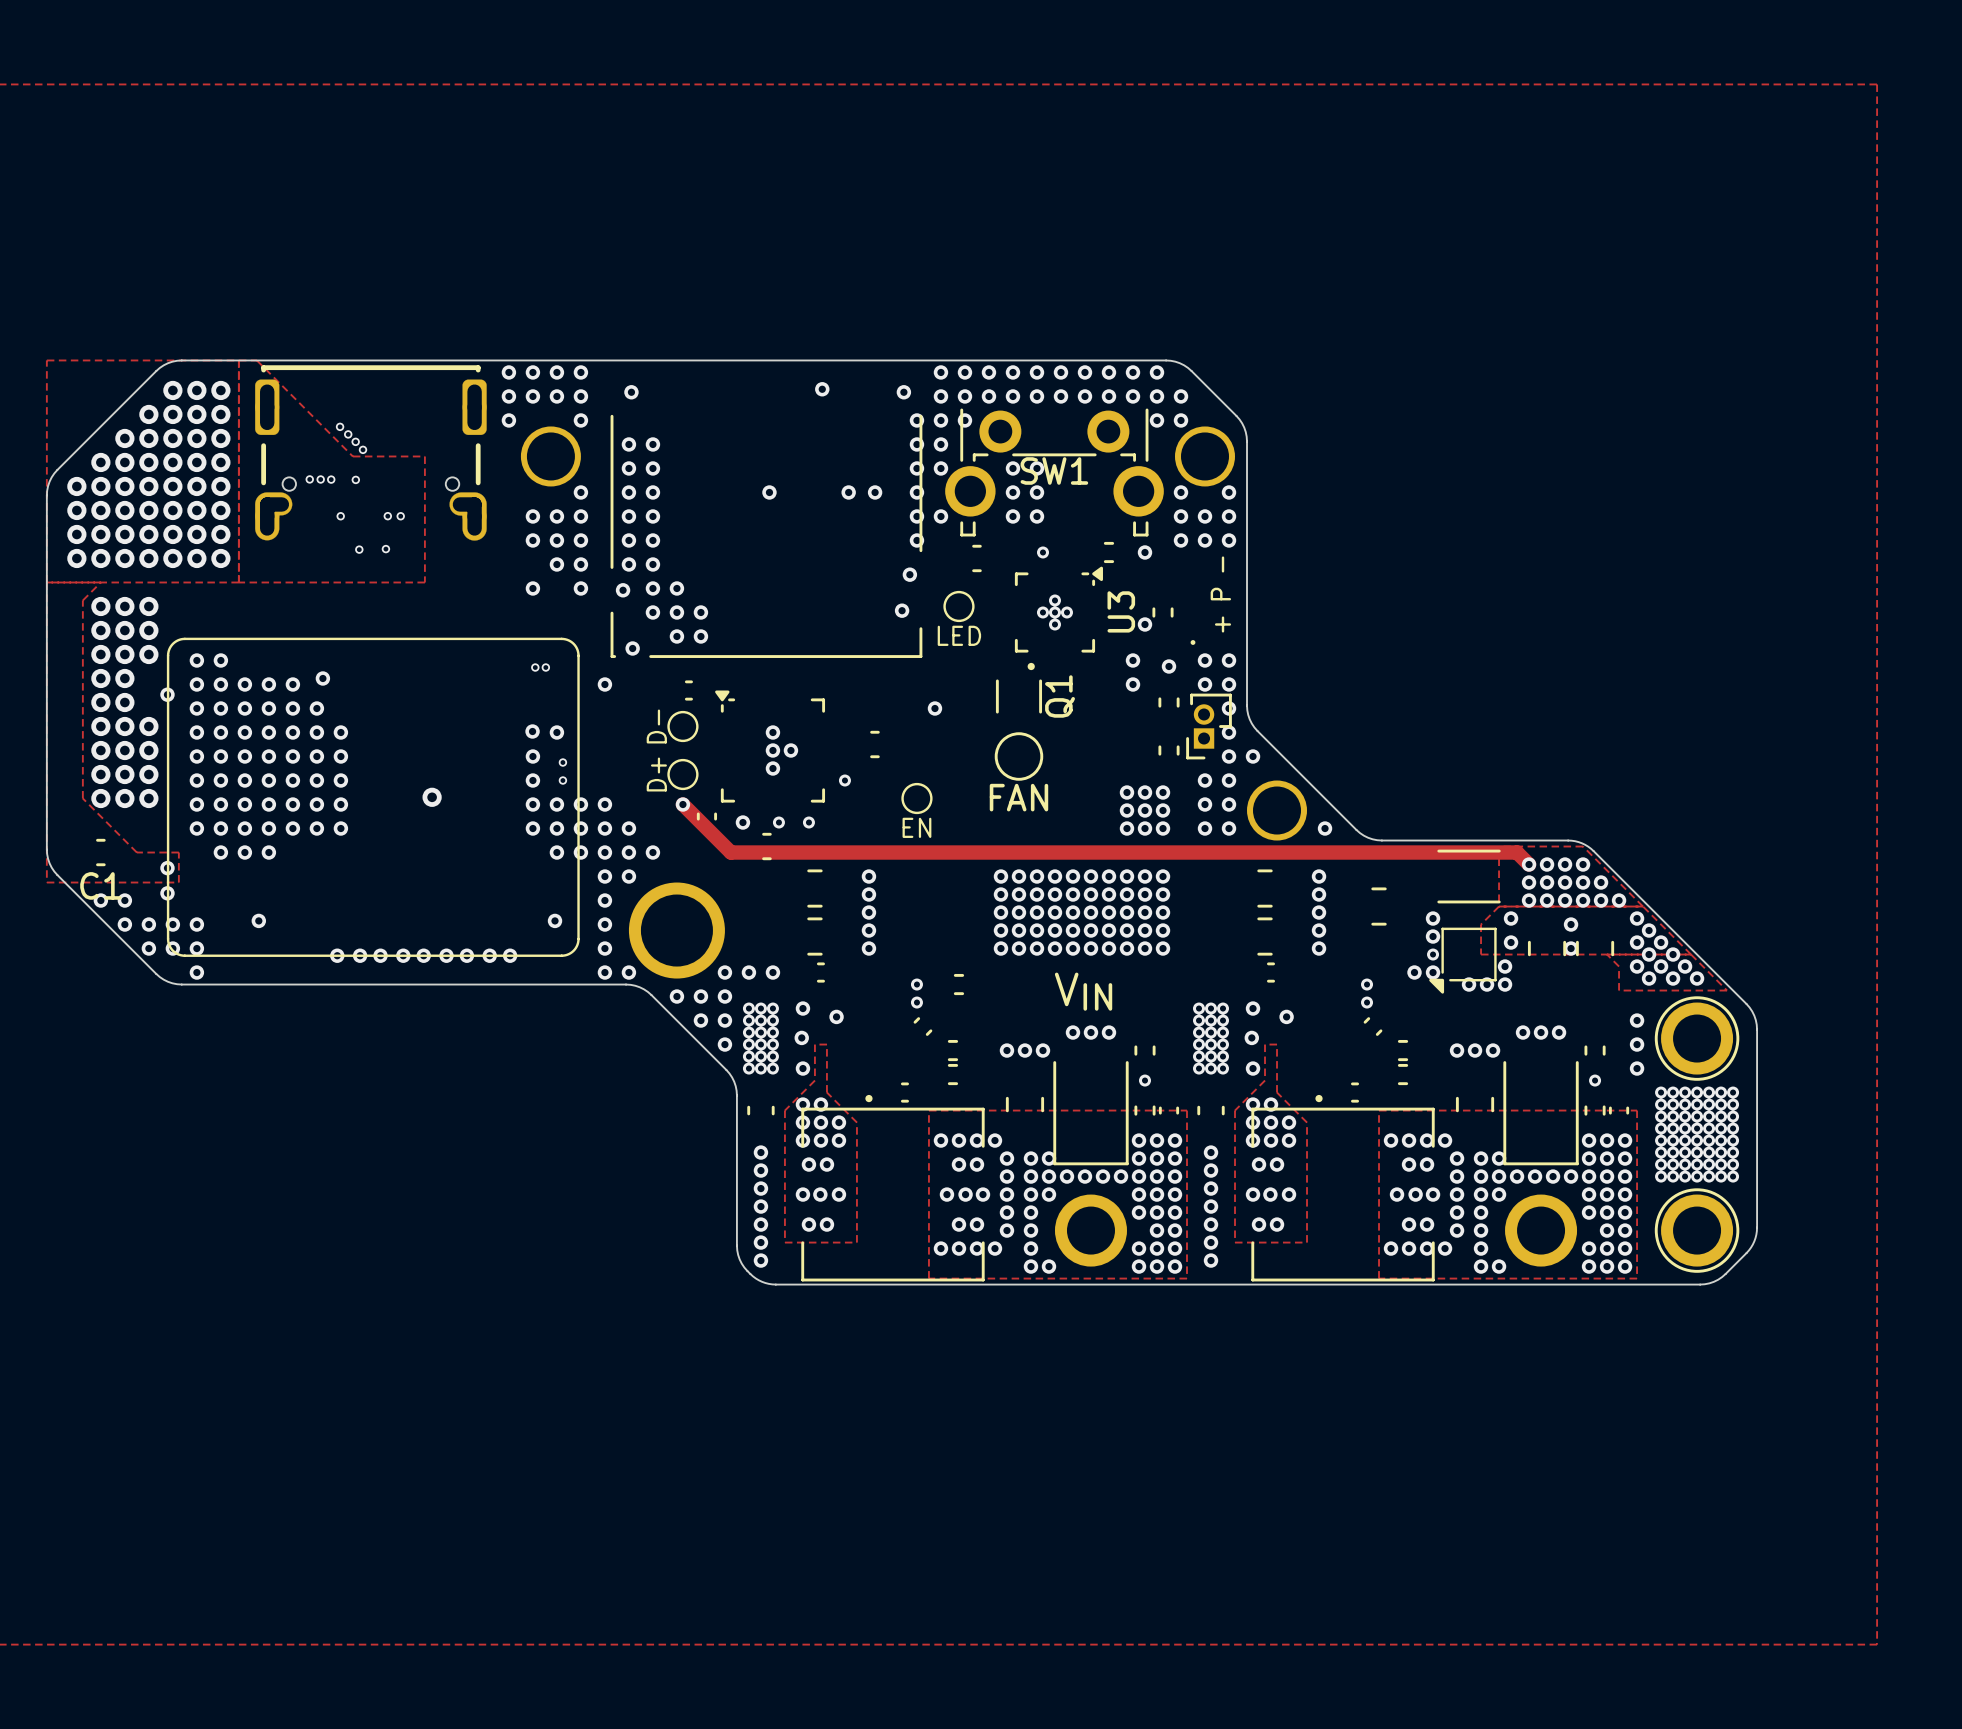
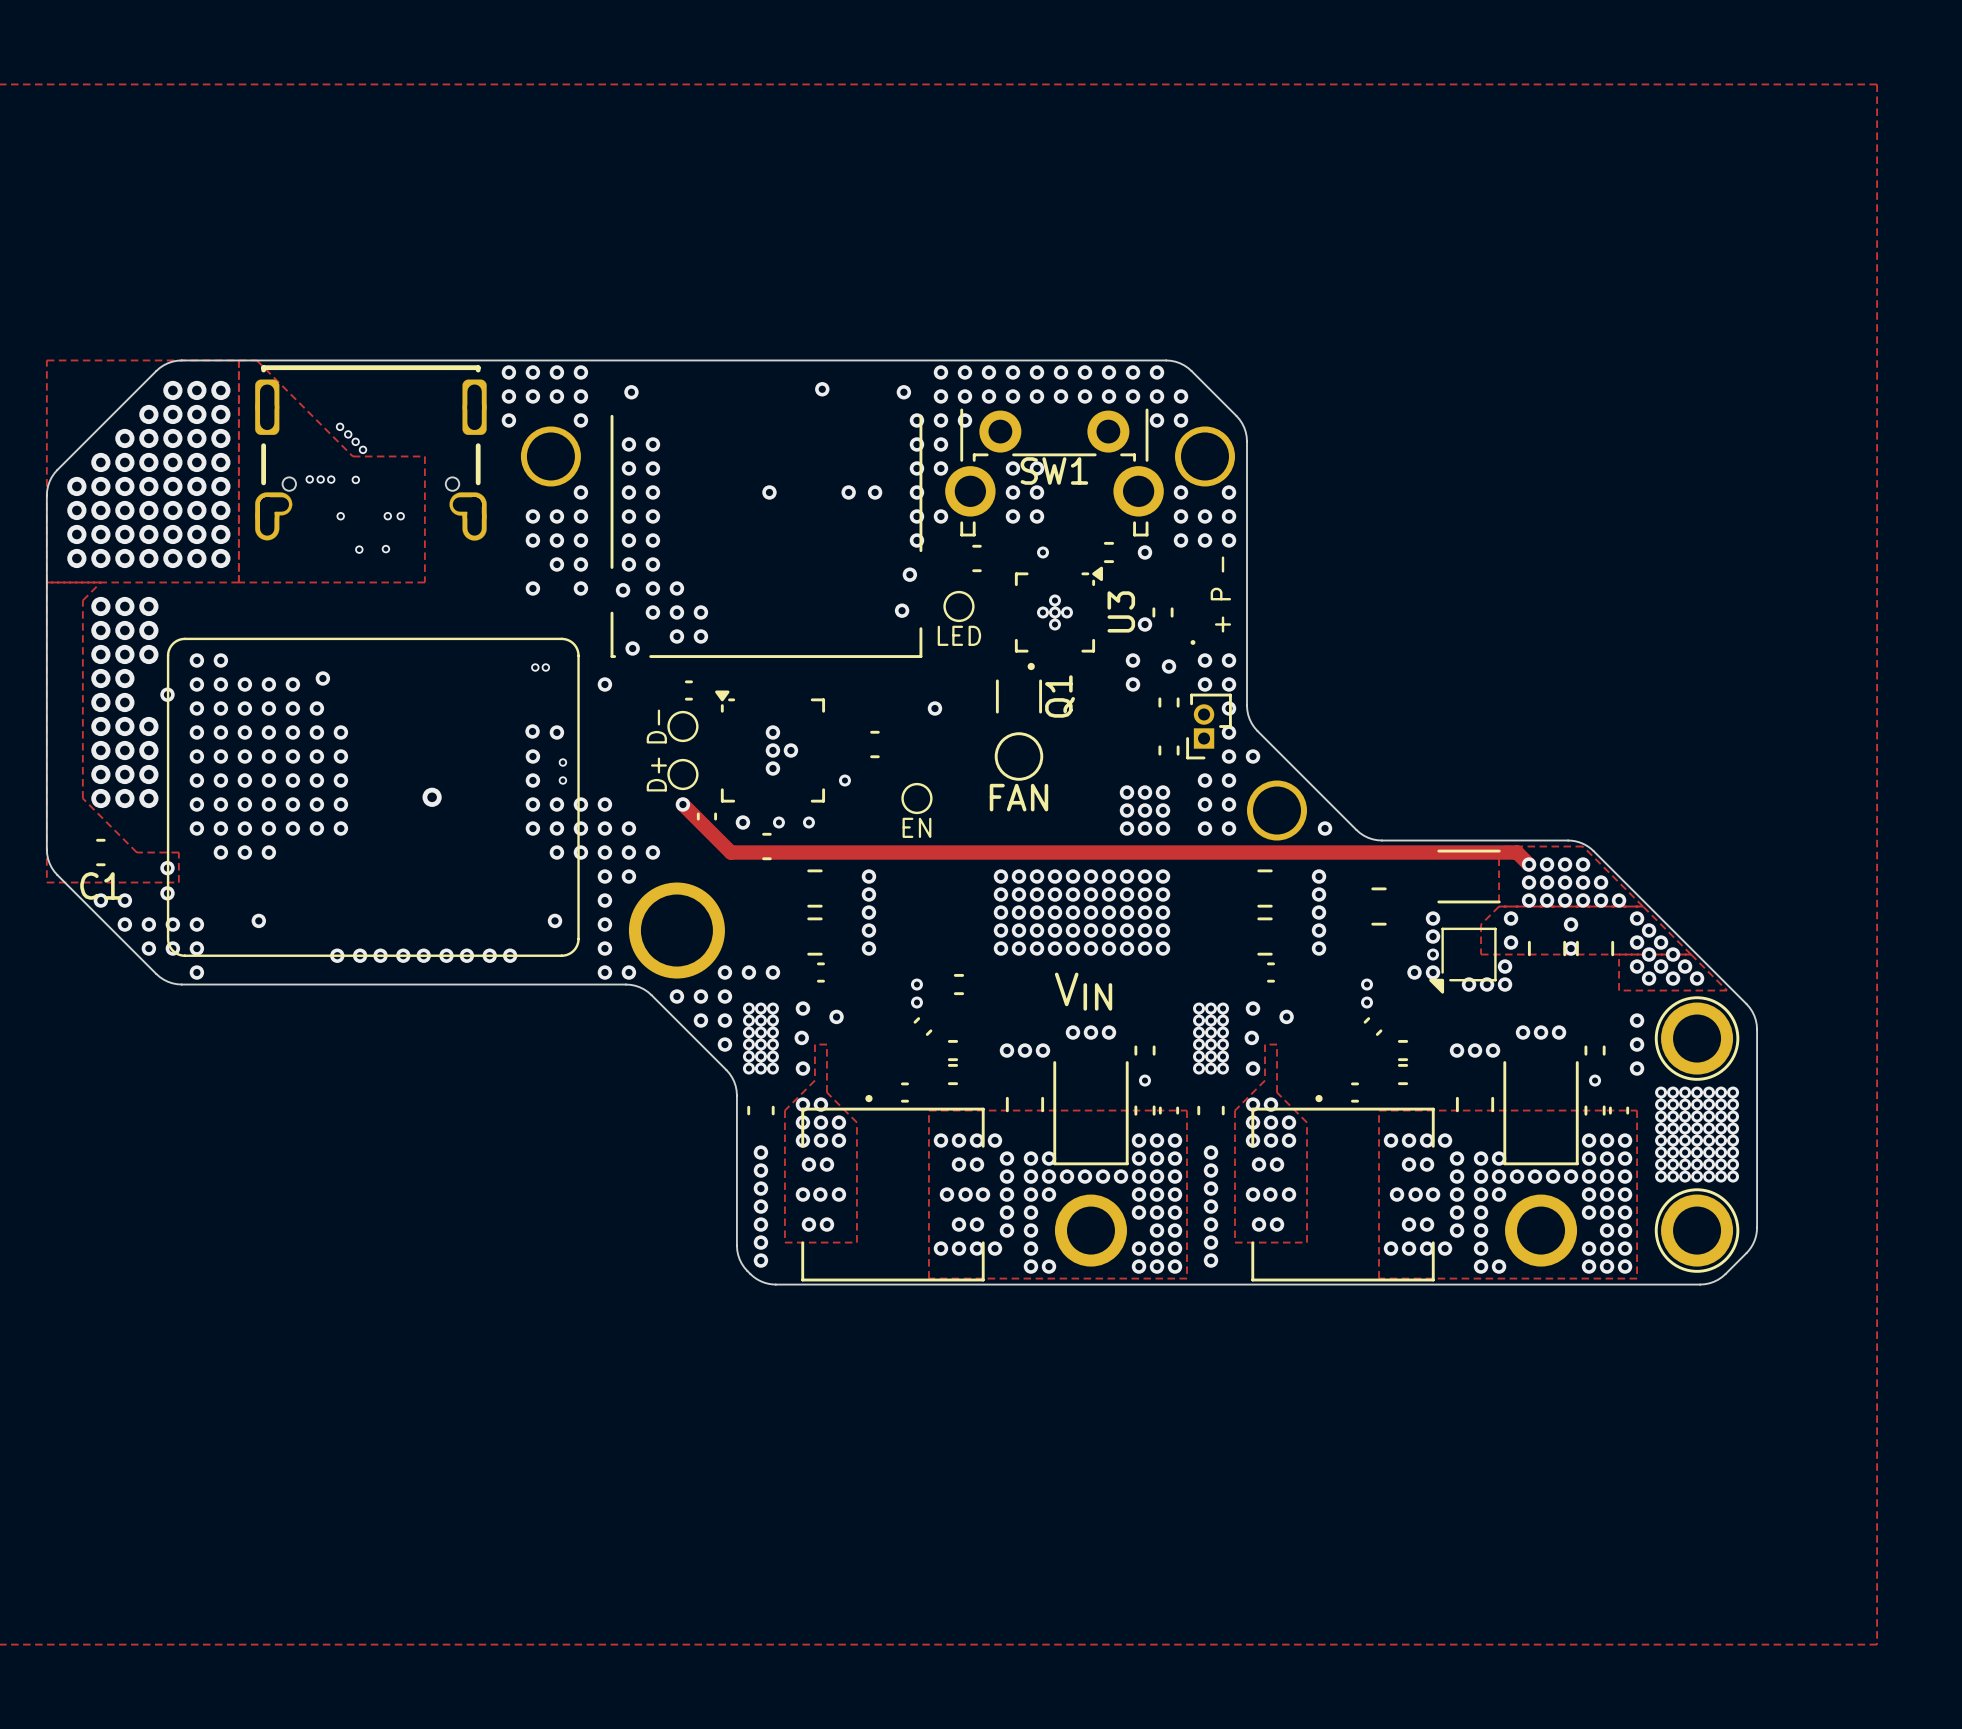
zone outline: (1607, 954) (1619, 966) -> (1619, 954) (1619, 966)

